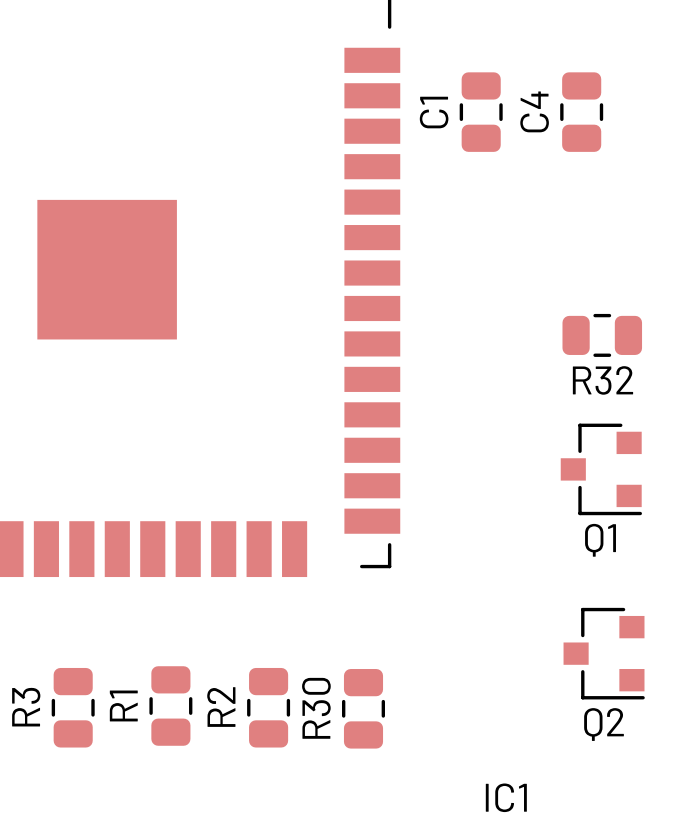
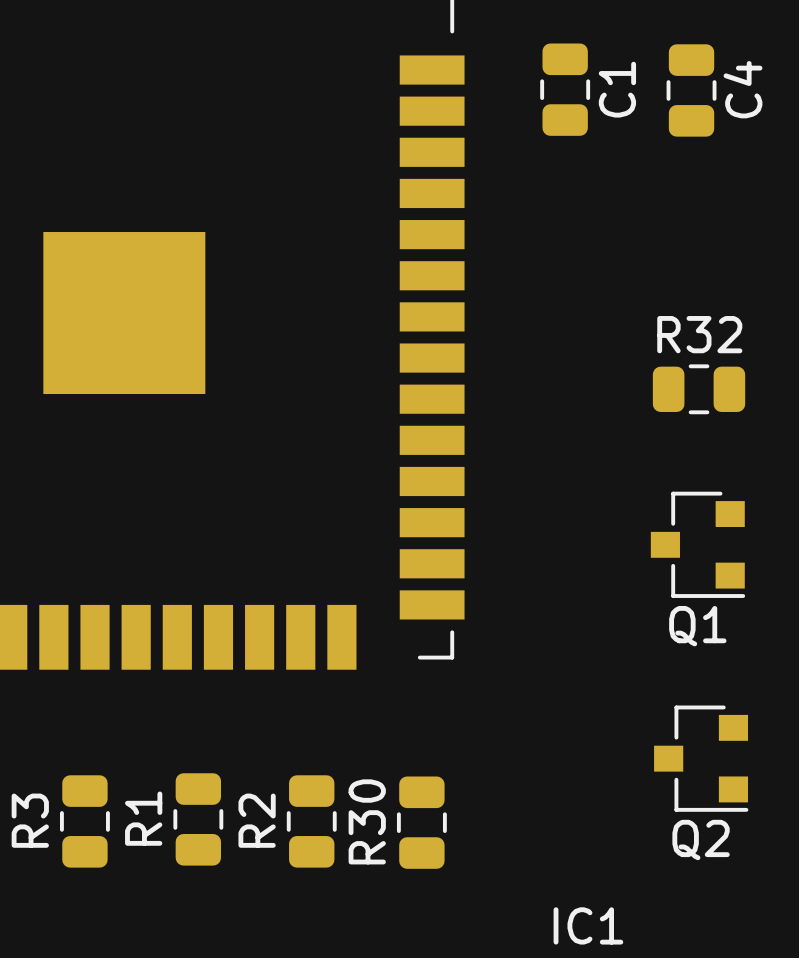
C4 name position: C4 (534, 111) -> C4 (743, 89)
C1 name position: C1 (434, 112) -> C1 (617, 89)
C1 position: (481, 112) -> (565, 89)
C4 position: (581, 112) -> (691, 90)
R32 name position: R32 (602, 380) -> R32 (699, 334)

